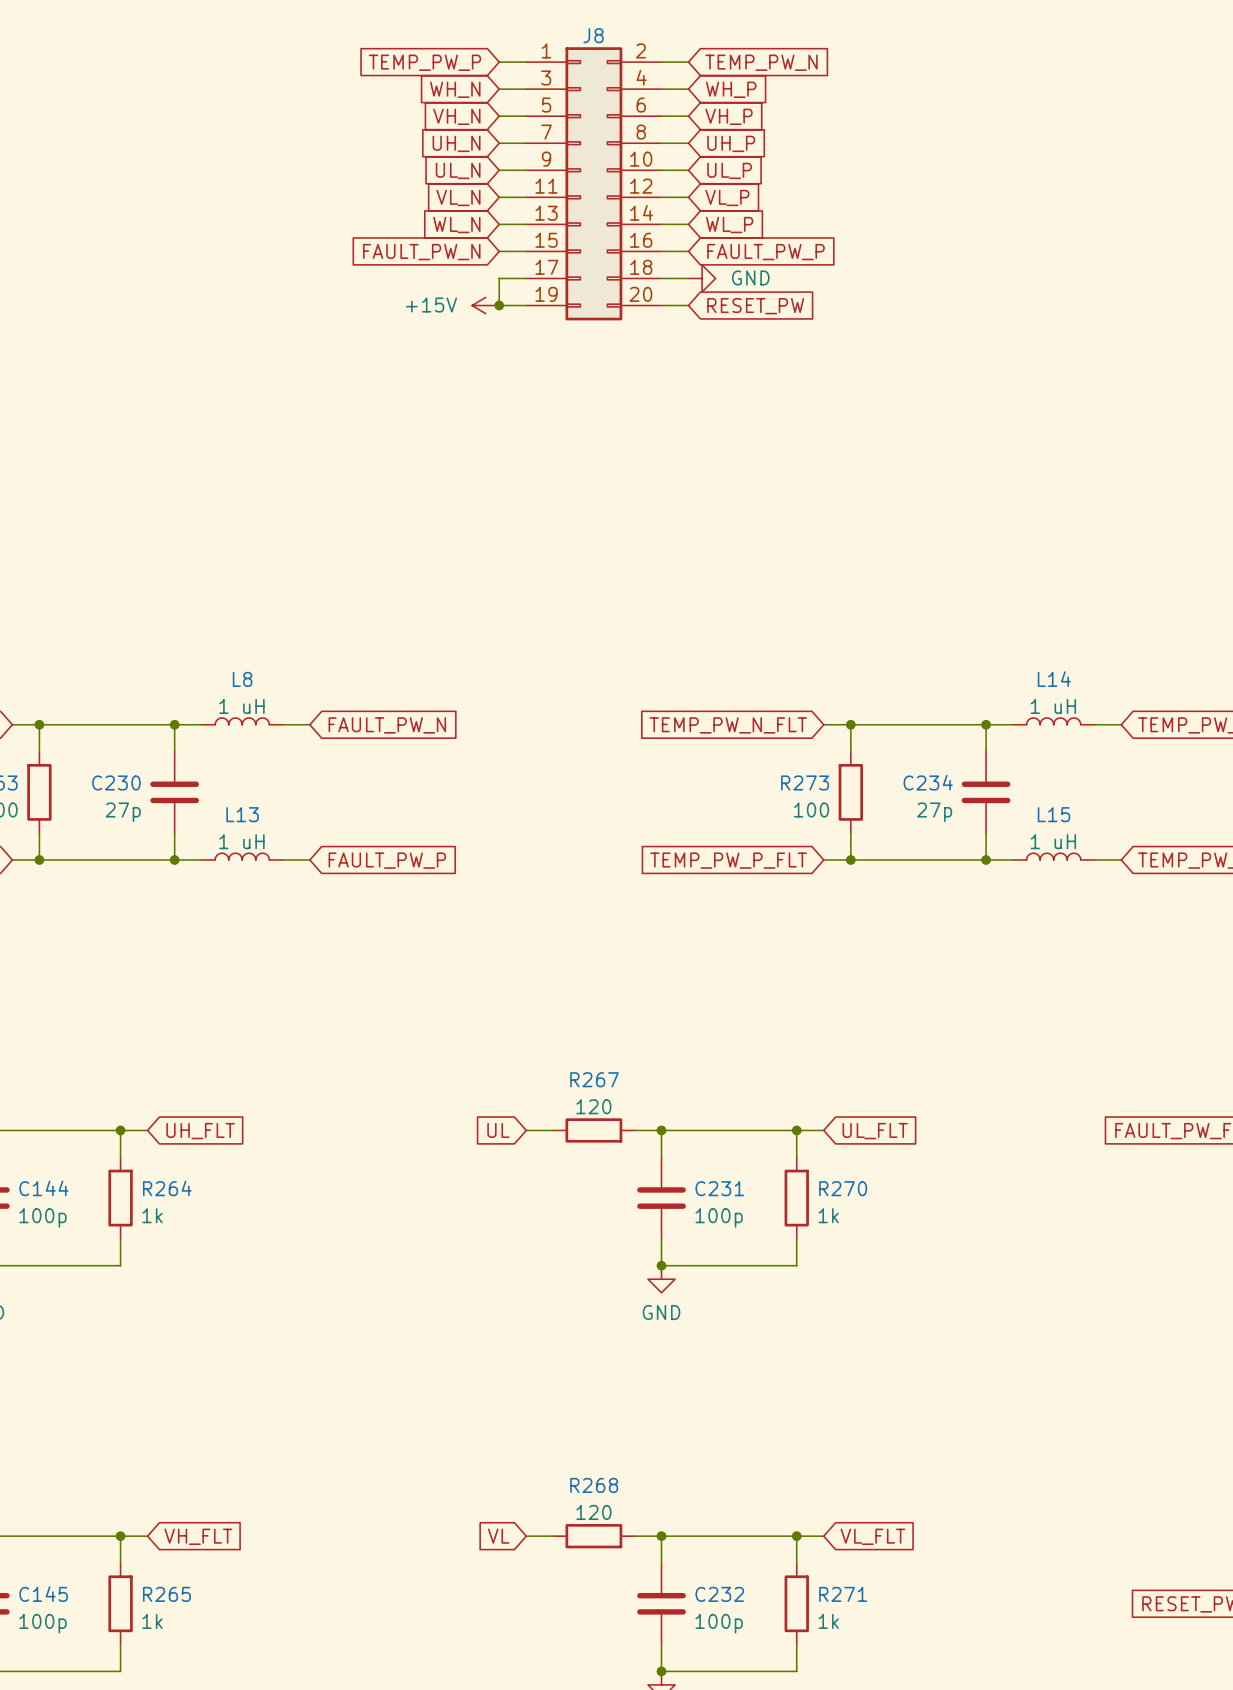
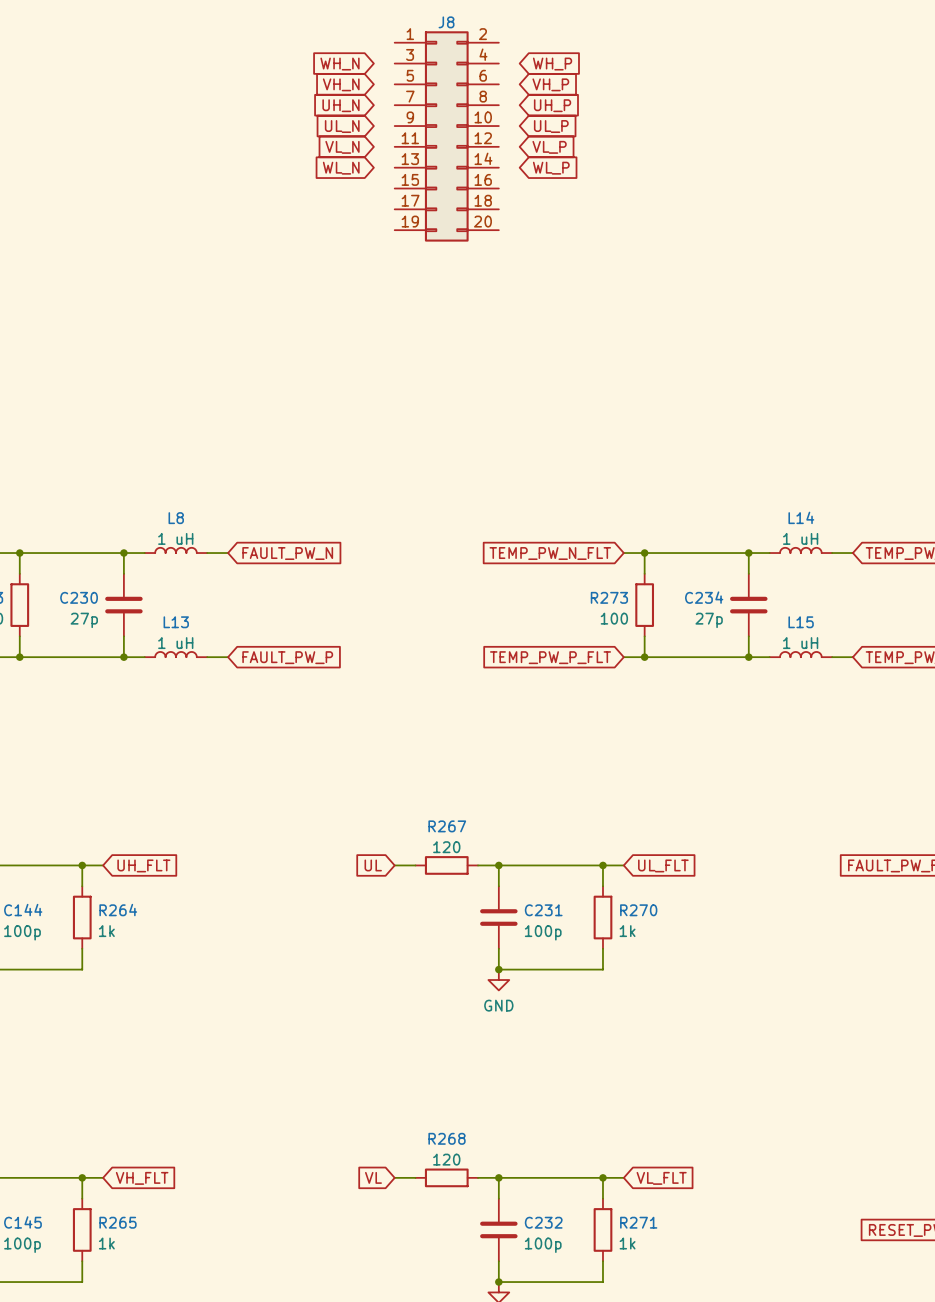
global label: TEMP_PW_P (424, 62) -> none
wire: (499, 62) (526, 62) -> none
wire: (661, 62) (688, 62) -> none
global label: TEMP_PW_N (761, 62) -> none
wire: (499, 89) (526, 89) -> none
wire: (661, 89) (688, 89) -> none
wire: (499, 116) (526, 116) -> none
wire: (661, 116) (688, 116) -> none
wire: (499, 143) (526, 143) -> none
wire: (661, 143) (688, 143) -> none
wire: (499, 170) (526, 170) -> none
wire: (661, 170) (688, 170) -> none
wire: (499, 197) (526, 197) -> none
wire: (661, 197) (688, 197) -> none
wire: (499, 224) (526, 224) -> none
wire: (661, 224) (688, 224) -> none
wire: (499, 251) (526, 251) -> none
wire: (661, 251) (688, 251) -> none
global label: FAULT_PW_N (421, 252) -> none
global label: FAULT_PW_P (766, 252) -> none
wire: (526, 278) (499, 278) (499, 305) (526, 305) -> none
wire: (661, 278) (688, 278) -> none
power symbol: GND (702, 278) -> none
power symbol: +15V (485, 305) -> none
junction: (499, 305) -> none
wire: (661, 305) (688, 305) -> none
global label: RESET_PW (755, 306) -> none

